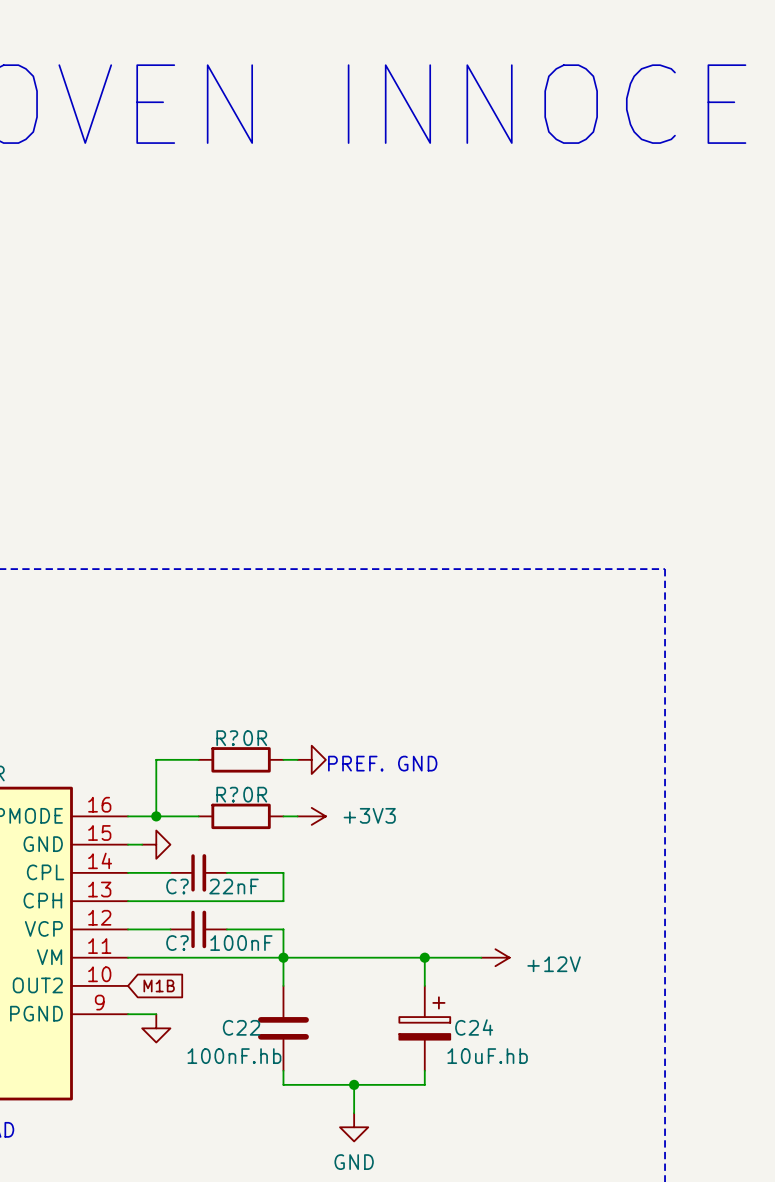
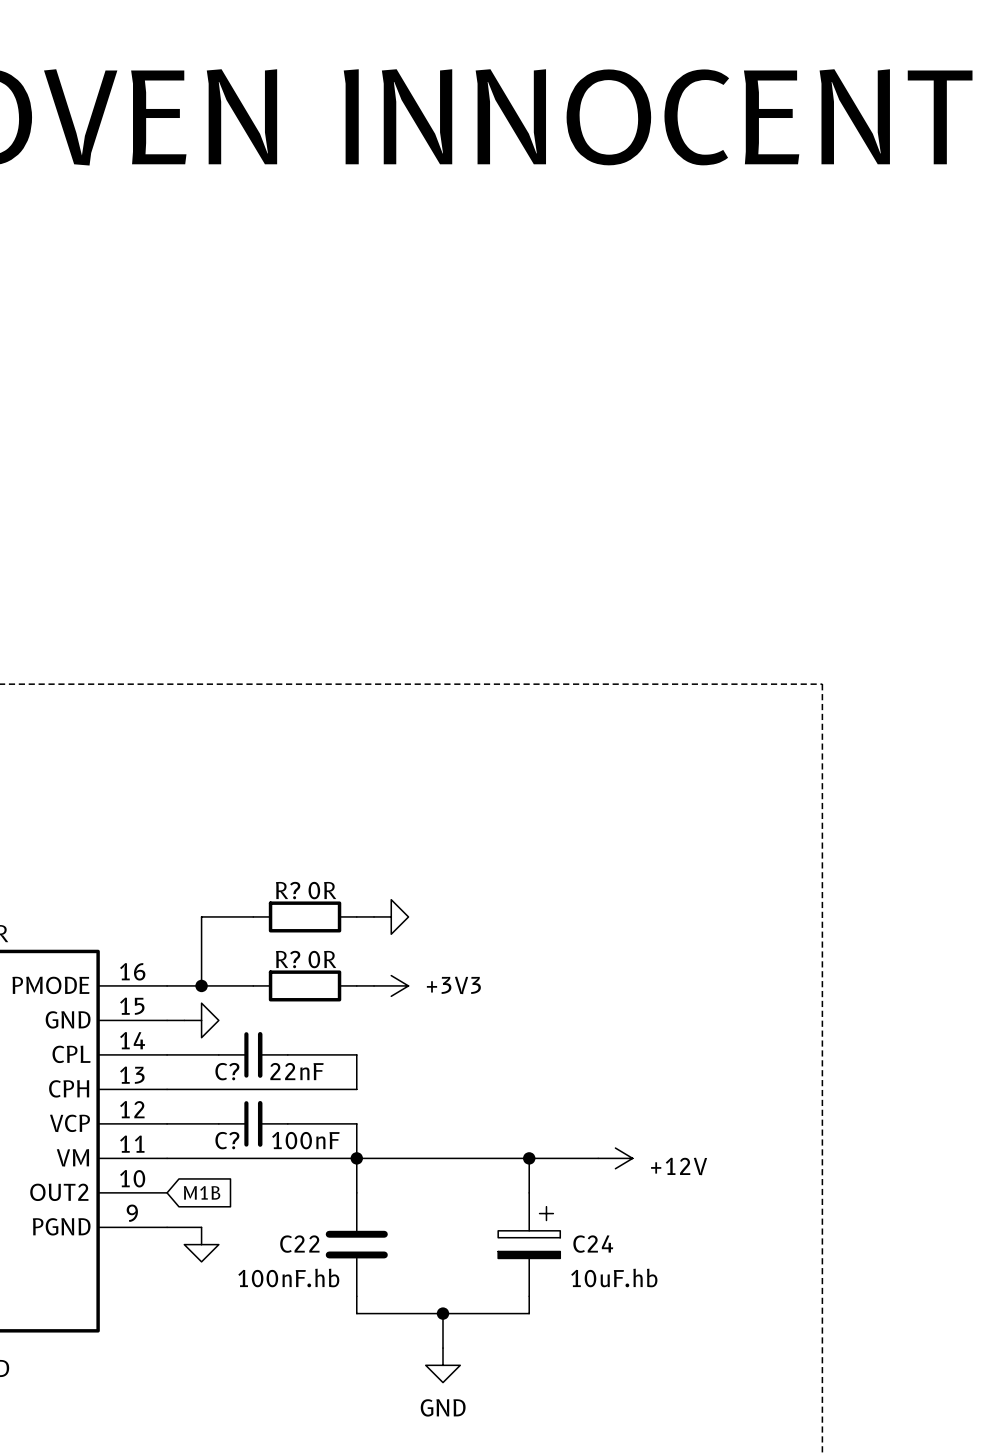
text: PREF. GND (382, 763) -> none

